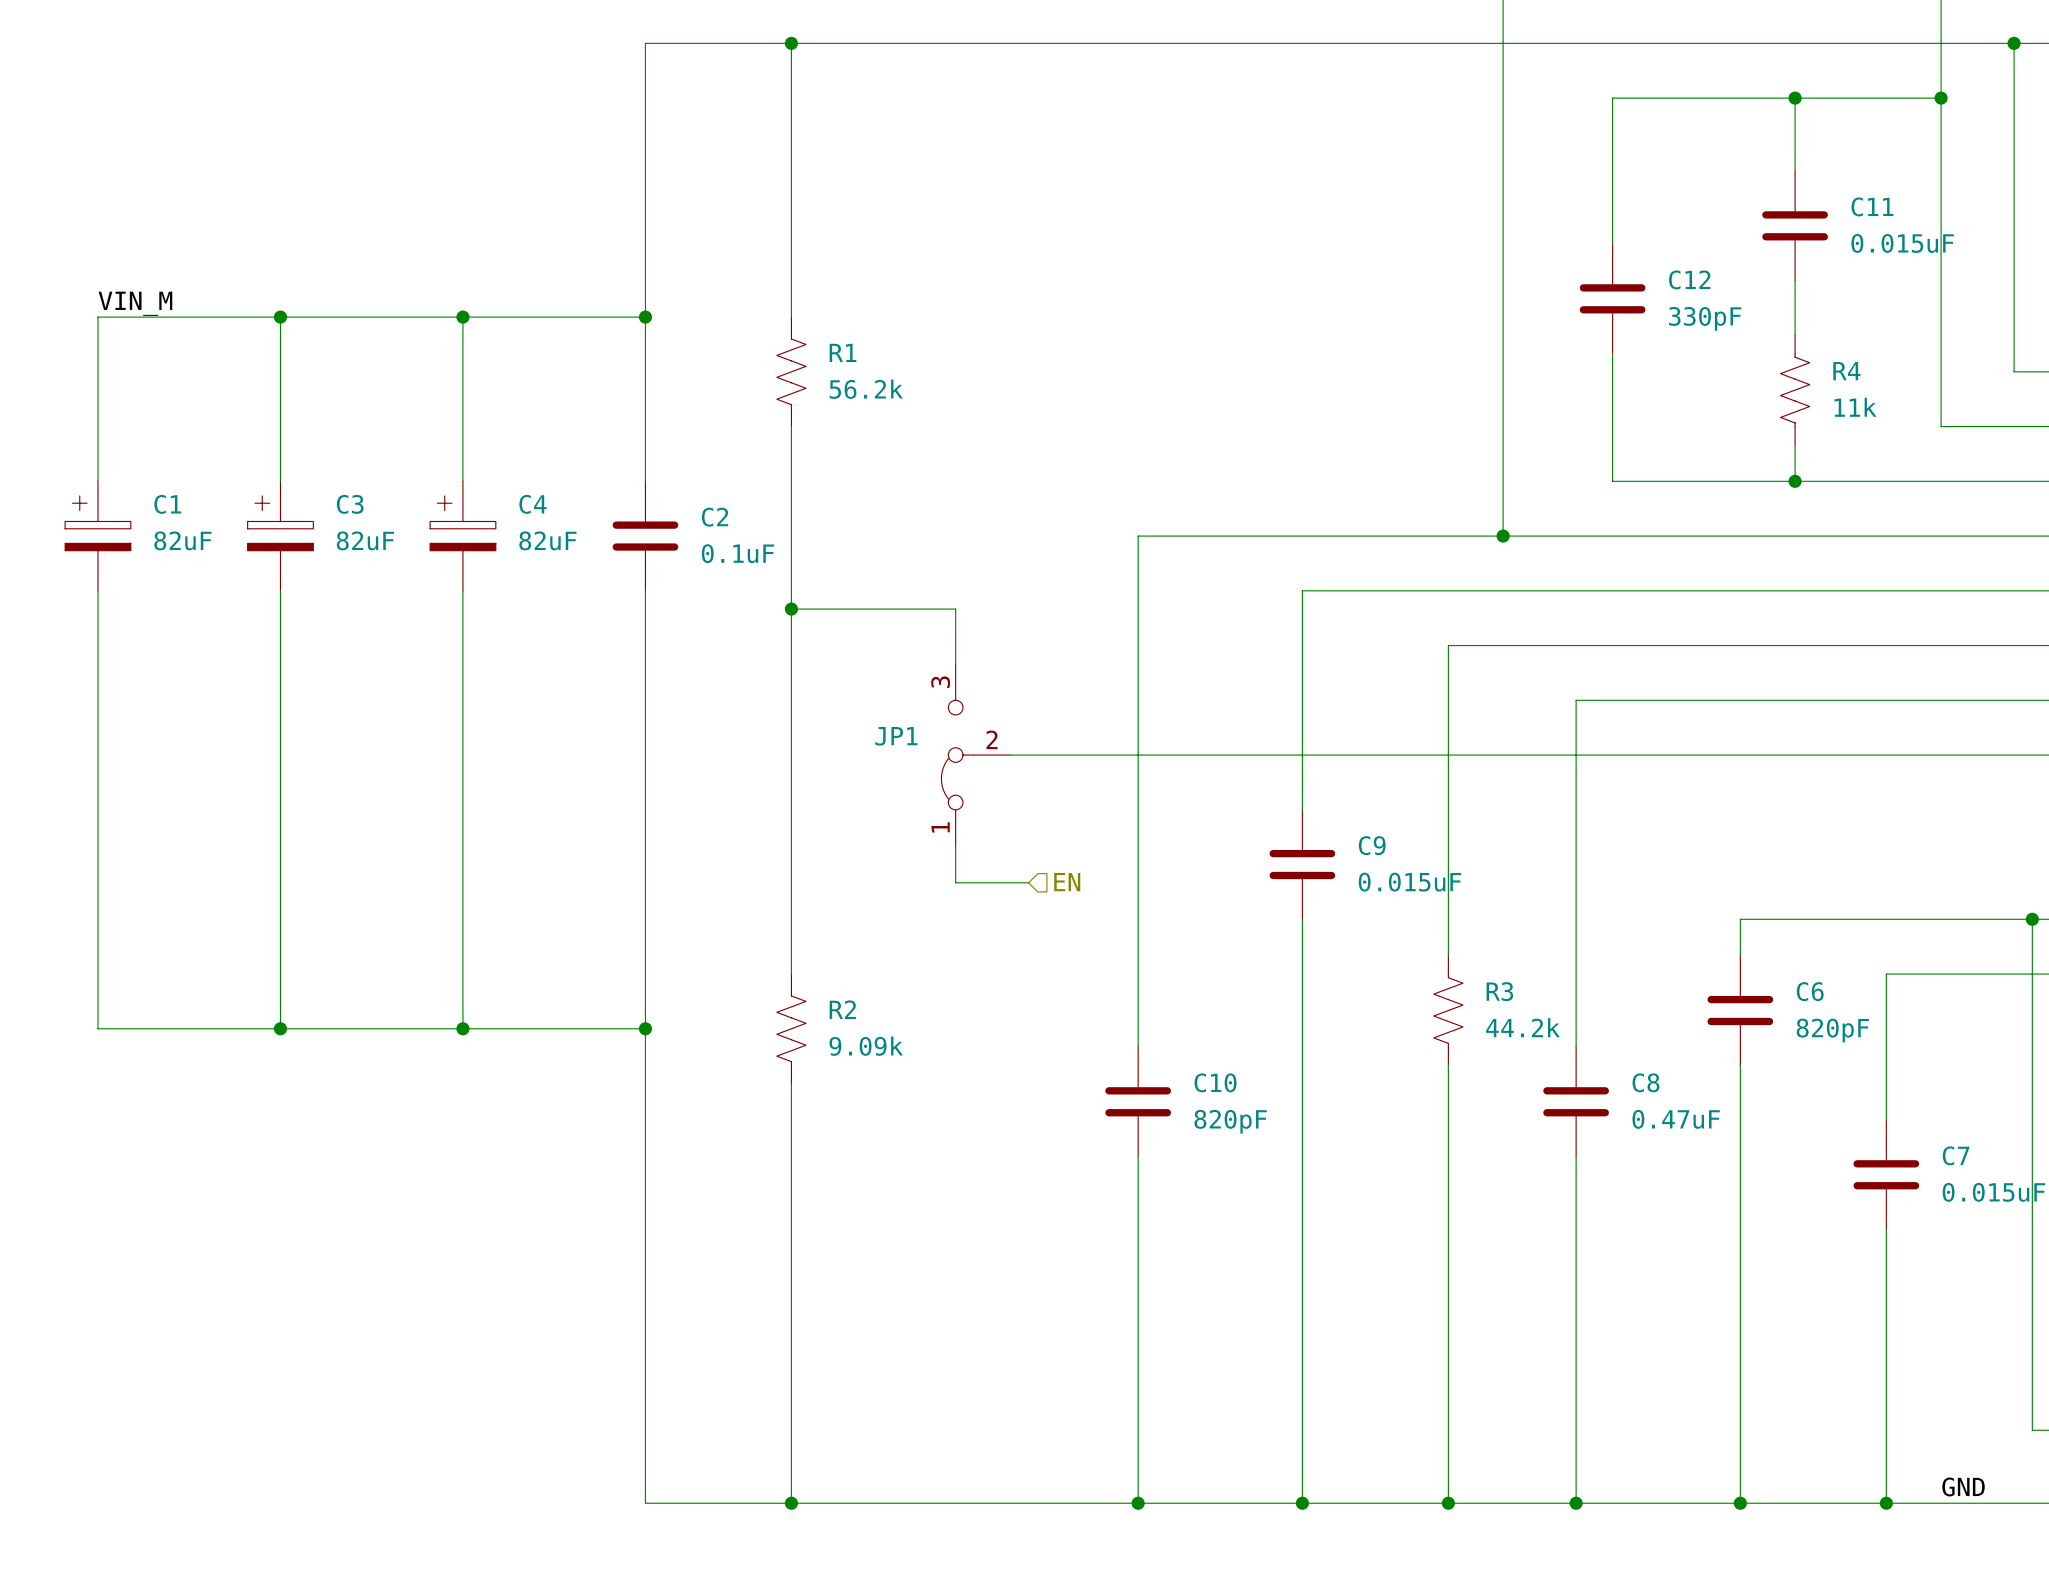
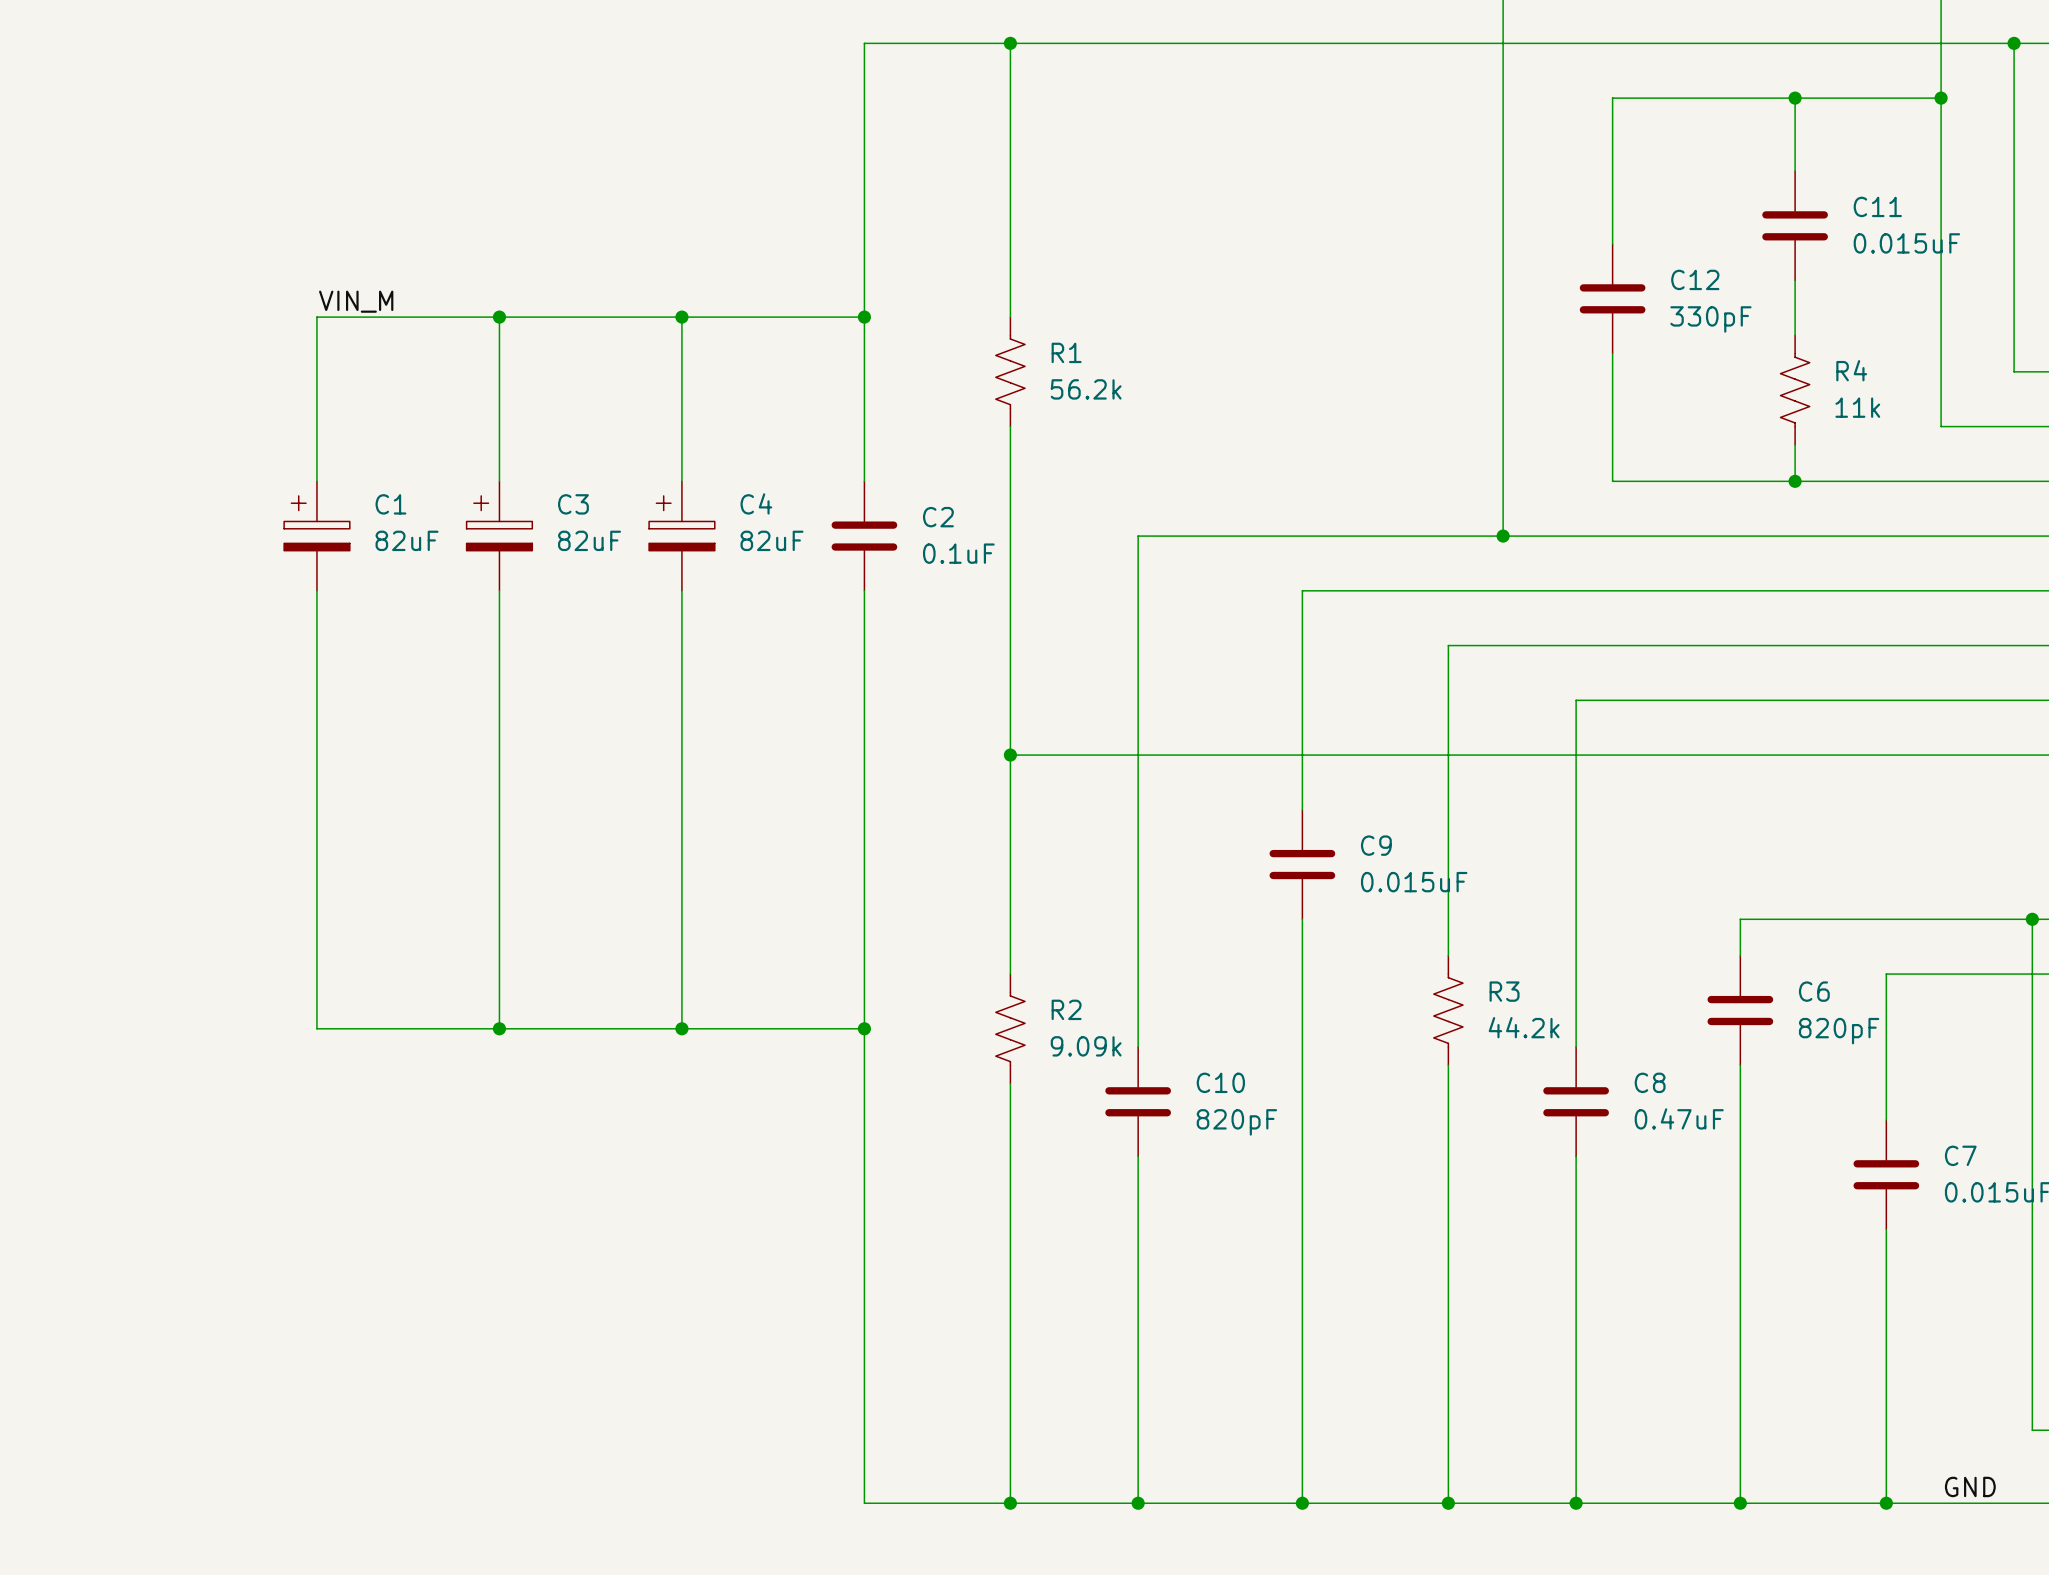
wire: (791, 43) (791, 317) -> (1010, 43) (1010, 317)
junction: (791, 43) -> none
wire: (864, 43) (645, 43) (645, 481) -> (864, 43) (864, 481)
junction: none -> (1010, 43)
label position: VIN_M (135, 303) -> VIN_M (356, 301)
wire: (280, 317) (280, 481) -> (499, 317) (499, 481)
junction: (280, 317) -> none
wire: (316, 317) (97, 317) (97, 481) -> (316, 317) (316, 481)
wire: (462, 317) (462, 481) -> (681, 317) (681, 481)
junction position: (462, 317) -> (499, 317)
wire: none -> (645, 317) (864, 317)
junction position: (645, 317) -> (681, 317)
junction: none -> (864, 317)
R1 position: (791, 371) -> (1010, 371)
wire: (791, 426) (791, 974) -> (1010, 426) (1010, 974)
C1 position: (97, 536) -> (316, 536)
C3 position: (280, 536) -> (499, 536)
C4 position: (462, 536) -> (681, 536)
C2 position: (645, 536) -> (864, 536)
wire: (97, 590) (97, 1028) (316, 1028) -> (316, 590) (316, 1028)
wire: (280, 590) (280, 1028) -> (499, 590) (499, 1028)
wire: (462, 590) (462, 1028) -> (681, 590) (681, 1028)
wire: (645, 590) (645, 1503) (864, 1503) -> (864, 590) (864, 1503)
wire: (791, 609) (955, 609) (955, 663) -> none
junction: (791, 609) -> none
JP1: (975, 755) -> none
junction: none -> (1010, 755)
wire: (955, 846) (955, 882) (1028, 882) -> none
hierarchical label: EN (1067, 882) -> none
junction: (280, 1028) -> none
junction position: (462, 1028) -> (499, 1028)
wire: none -> (645, 1028) (864, 1028)
junction position: (645, 1028) -> (681, 1028)
R2 position: (791, 1028) -> (1010, 1028)
junction: none -> (864, 1028)
wire: (791, 1083) (791, 1503) -> (1010, 1083) (1010, 1503)
junction: (791, 1503) -> none
junction: none -> (1010, 1503)

